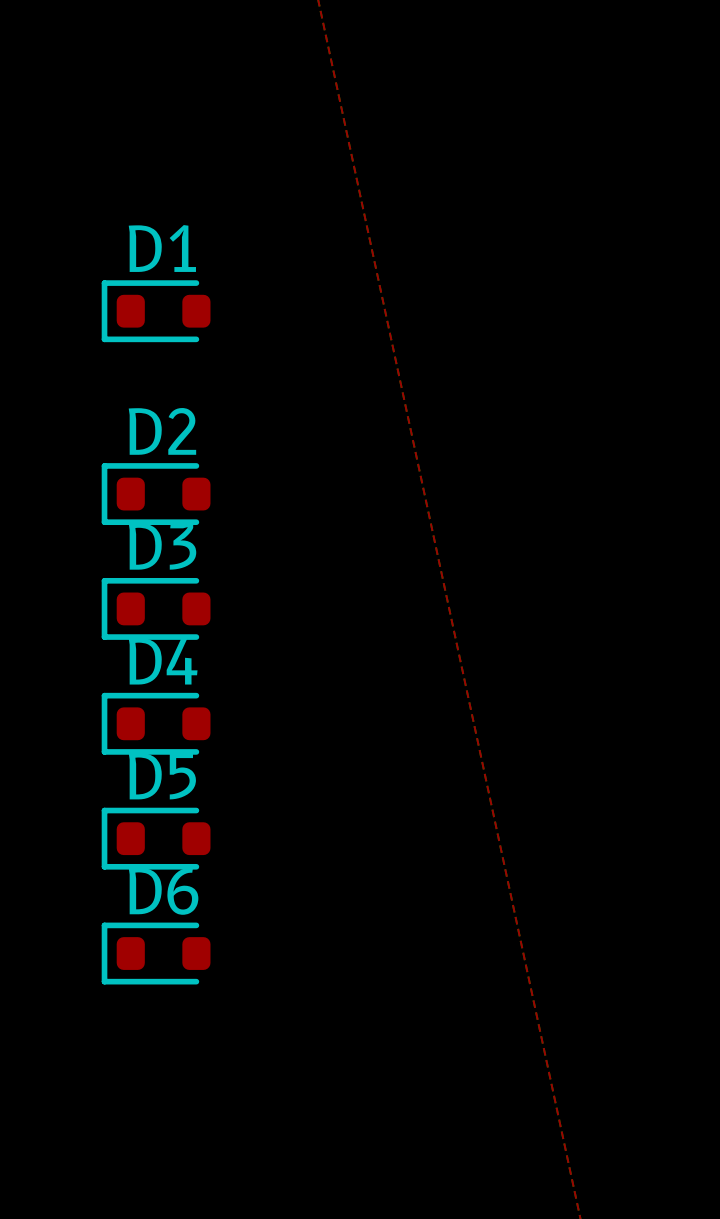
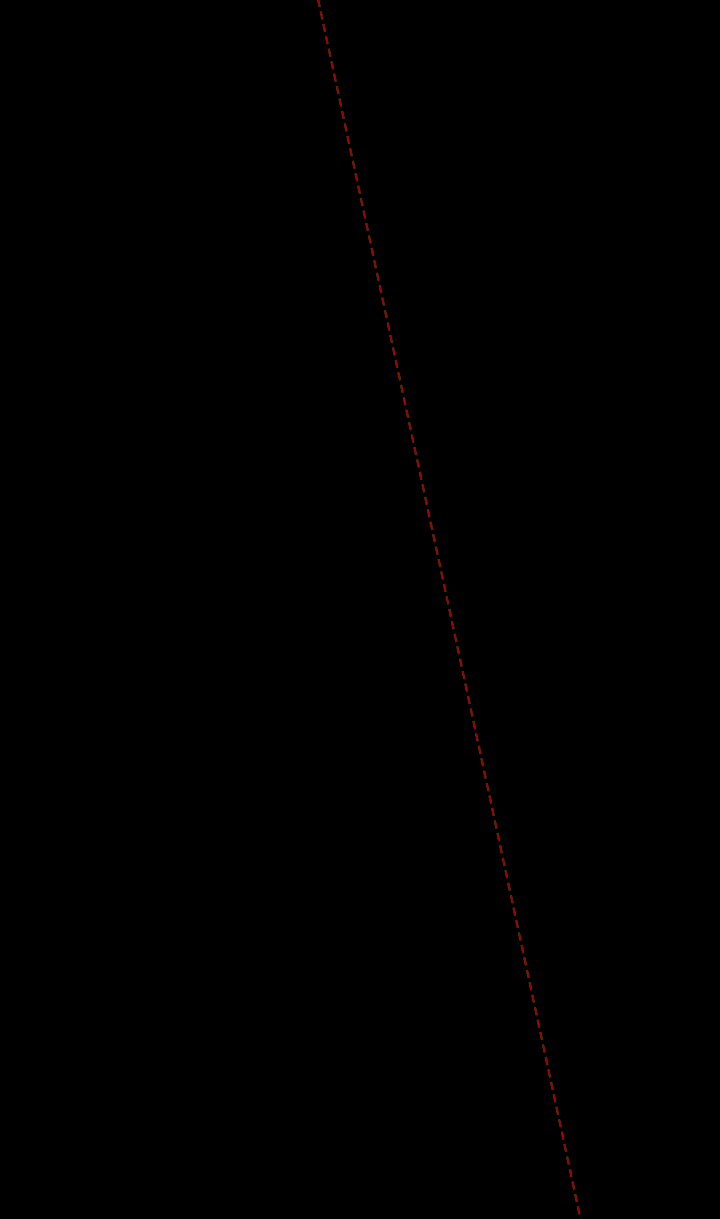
D1: (156, 311) -> none
D2: (156, 494) -> none
D3: (156, 608) -> none
D4: (156, 723) -> none
D5: (156, 838) -> none
D6: (156, 953) -> none

